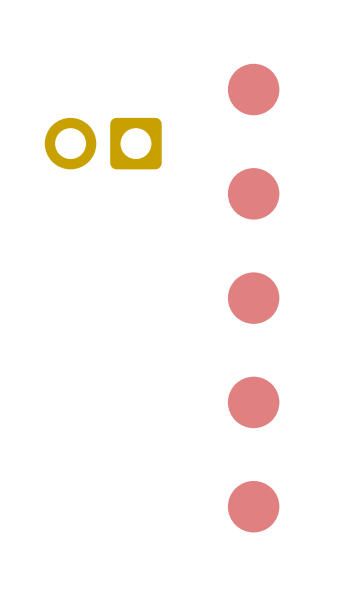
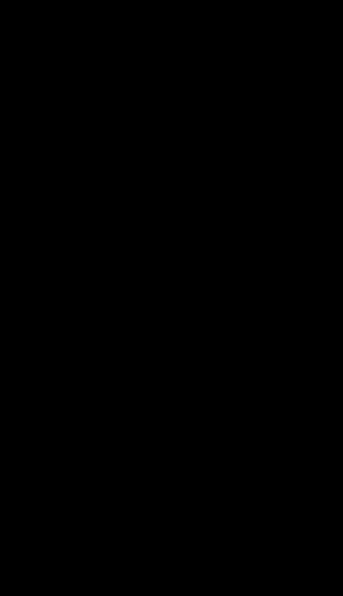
part: (253, 89) -> none
part: (103, 143) -> none
part: (253, 193) -> none
part: (253, 298) -> none
part: (253, 402) -> none
part: (253, 506) -> none

